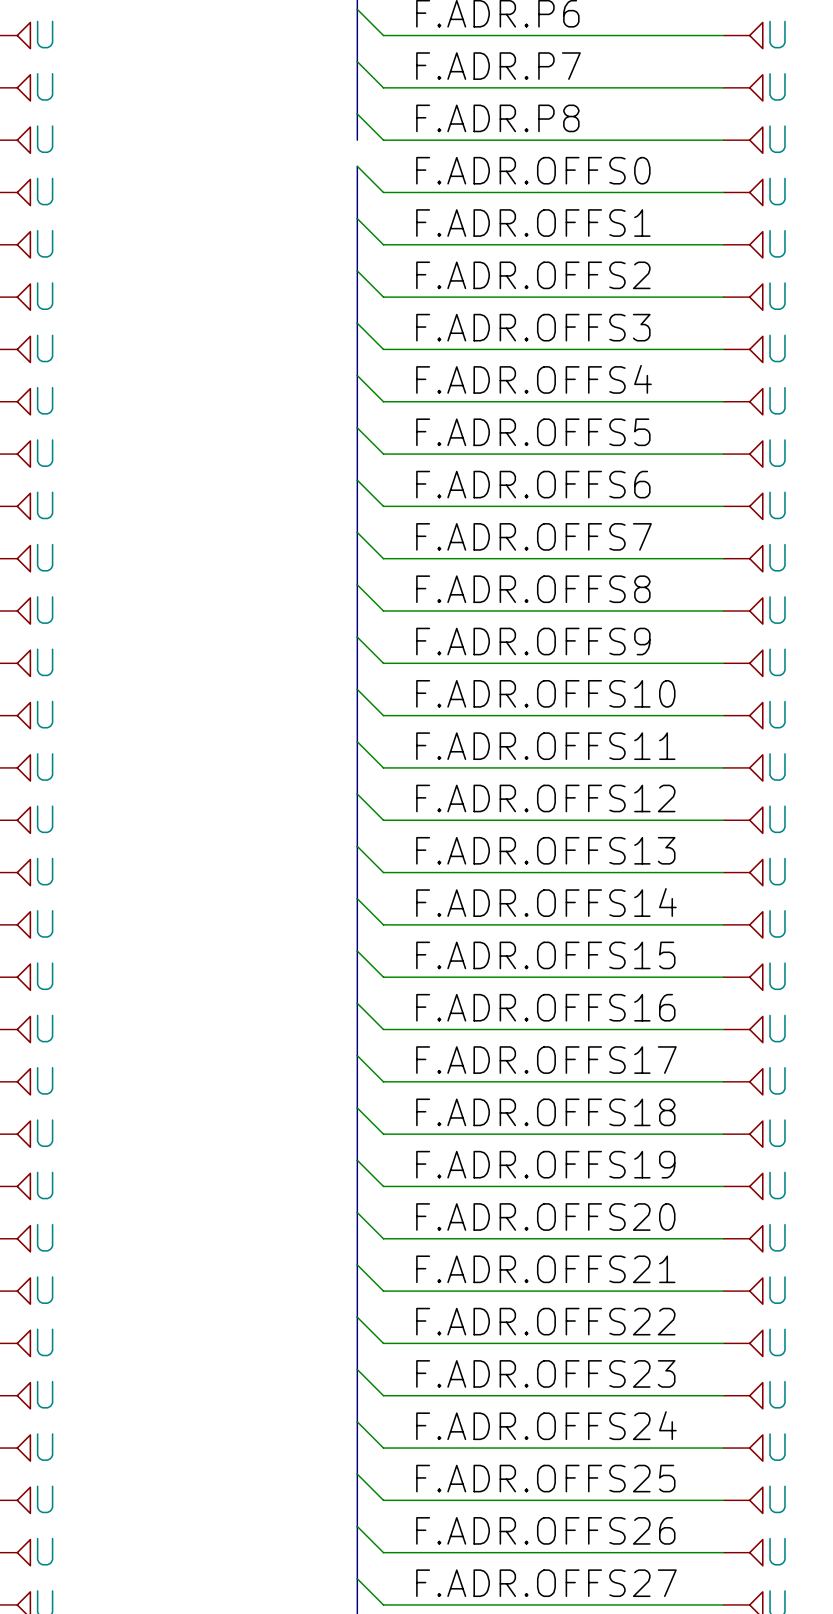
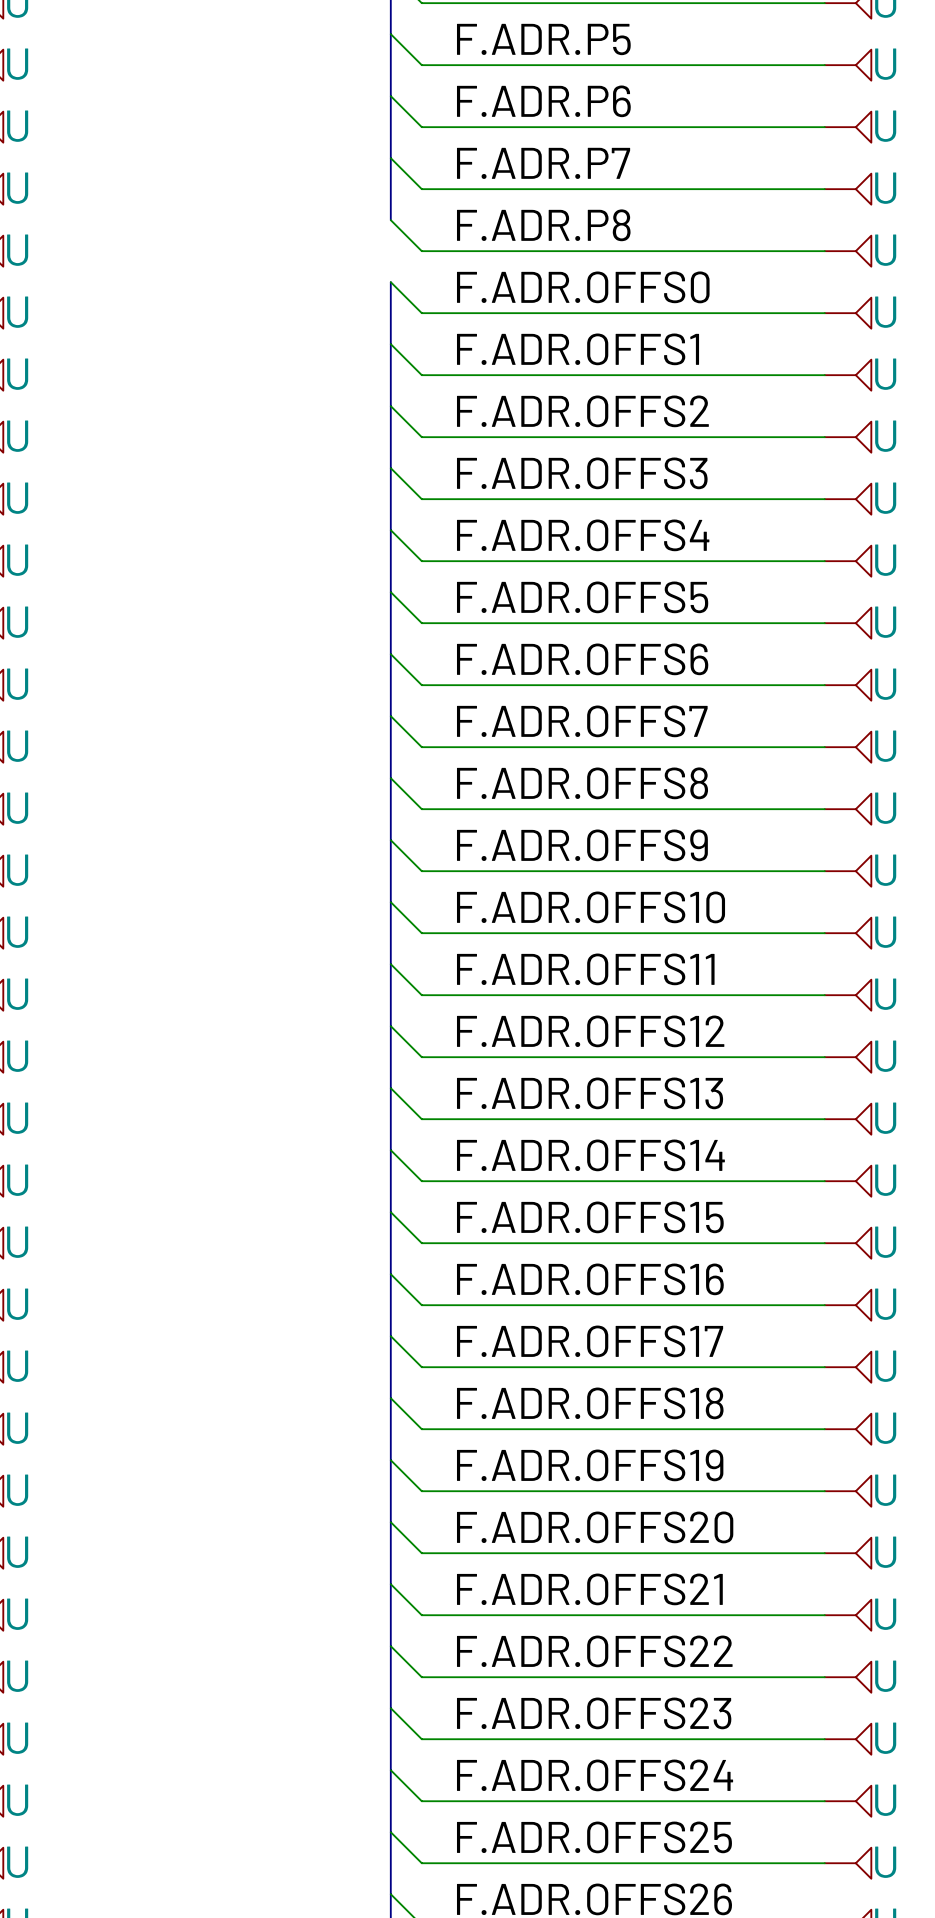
bus: (357, 114) (357, 140) -> none

